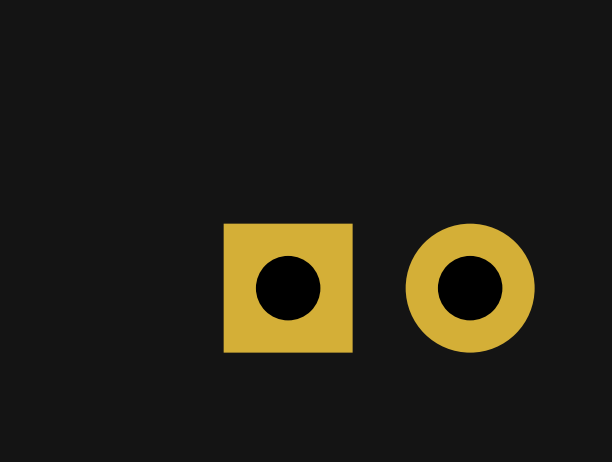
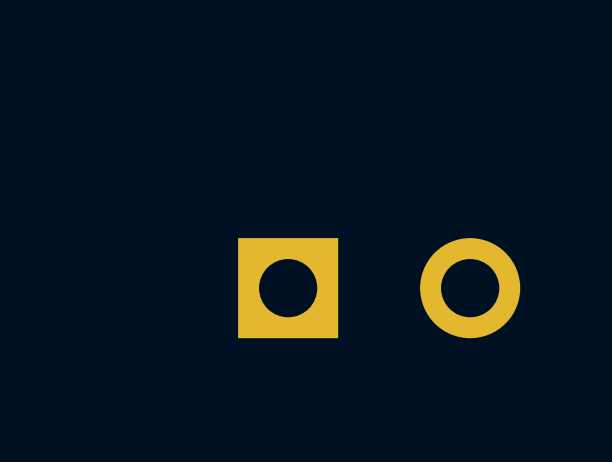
part footprint: [223, 223, 535, 353] -> [238, 238, 521, 339]

